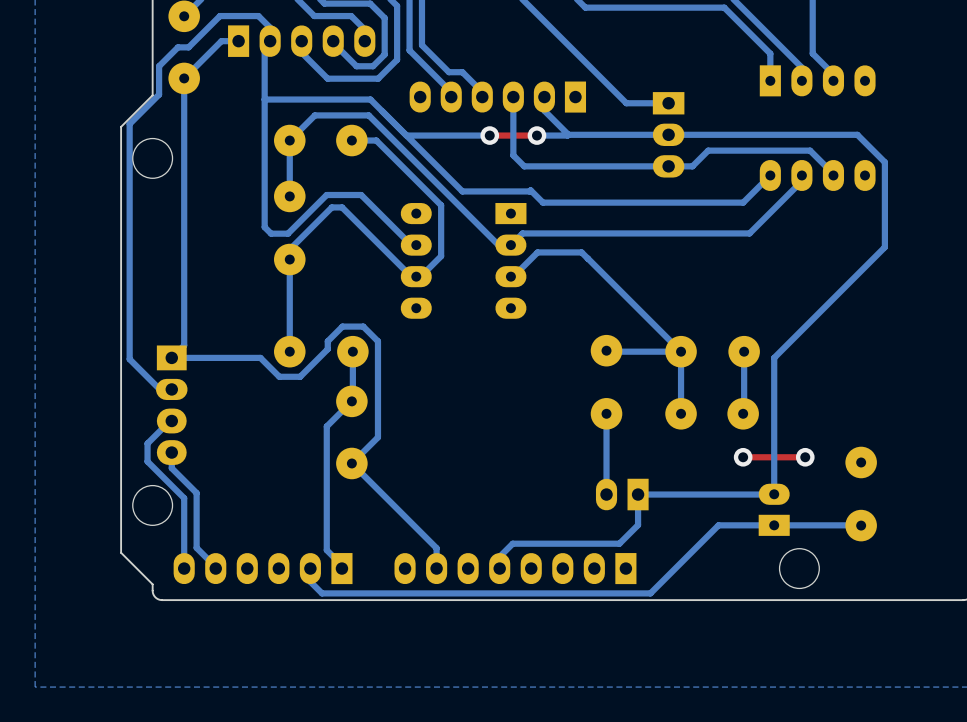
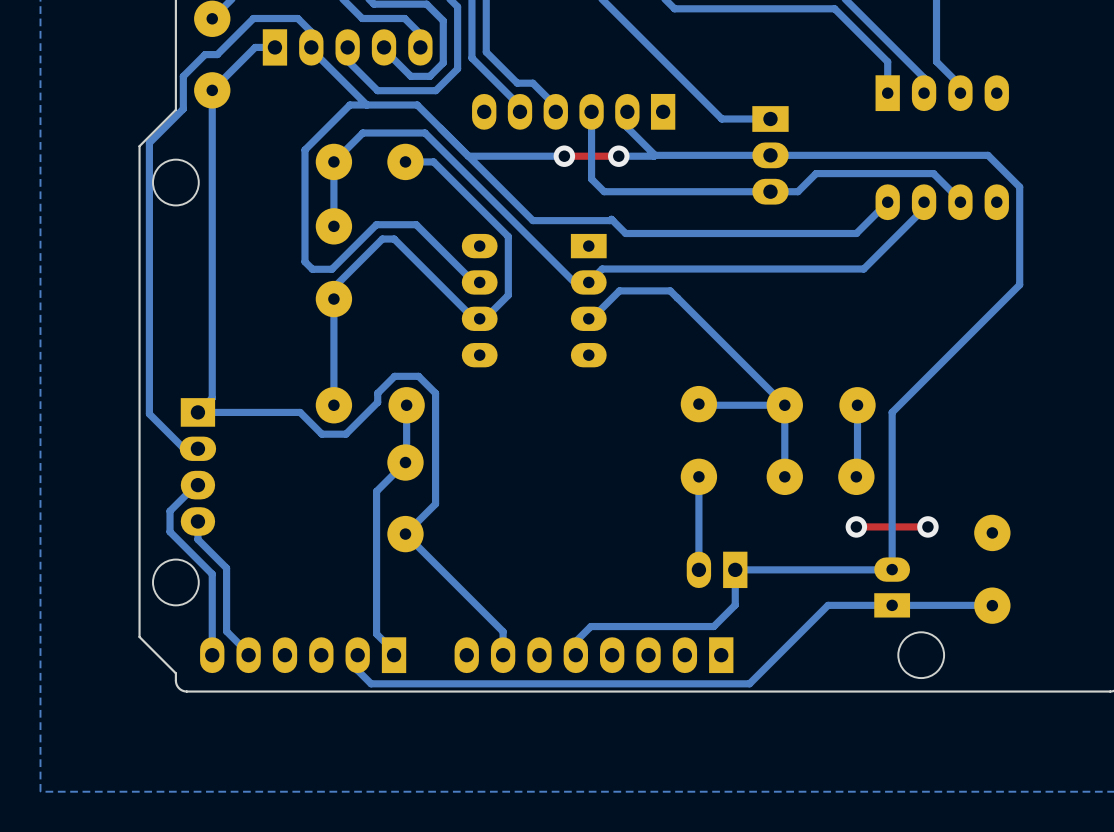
bottom track: (270, 41) (264, 46) (264, 130) -> none
bottom track: none -> (311, 49) (366, 105)
bottom track: (370, 99) (264, 99) -> (426, 114) (417, 105) (349, 105) (304, 149)

